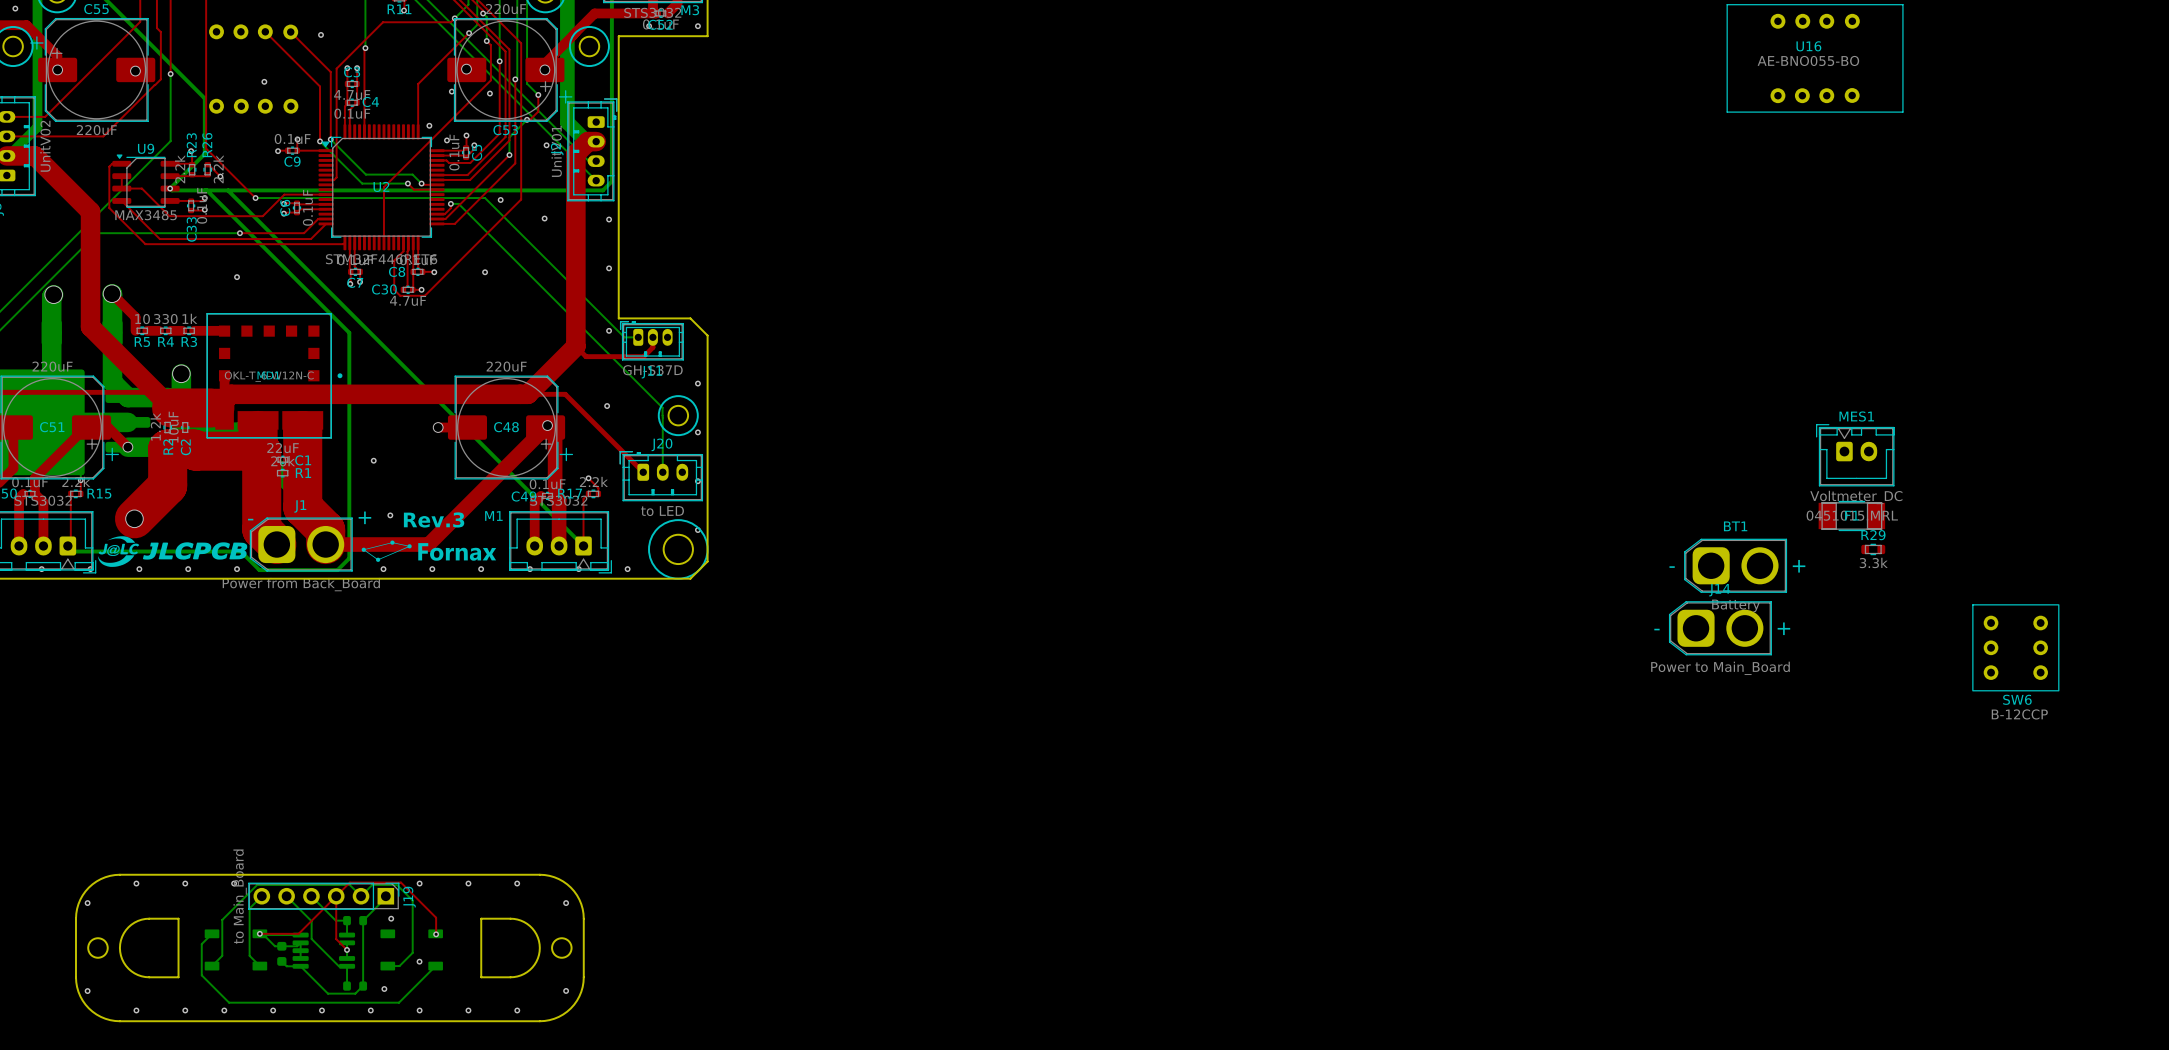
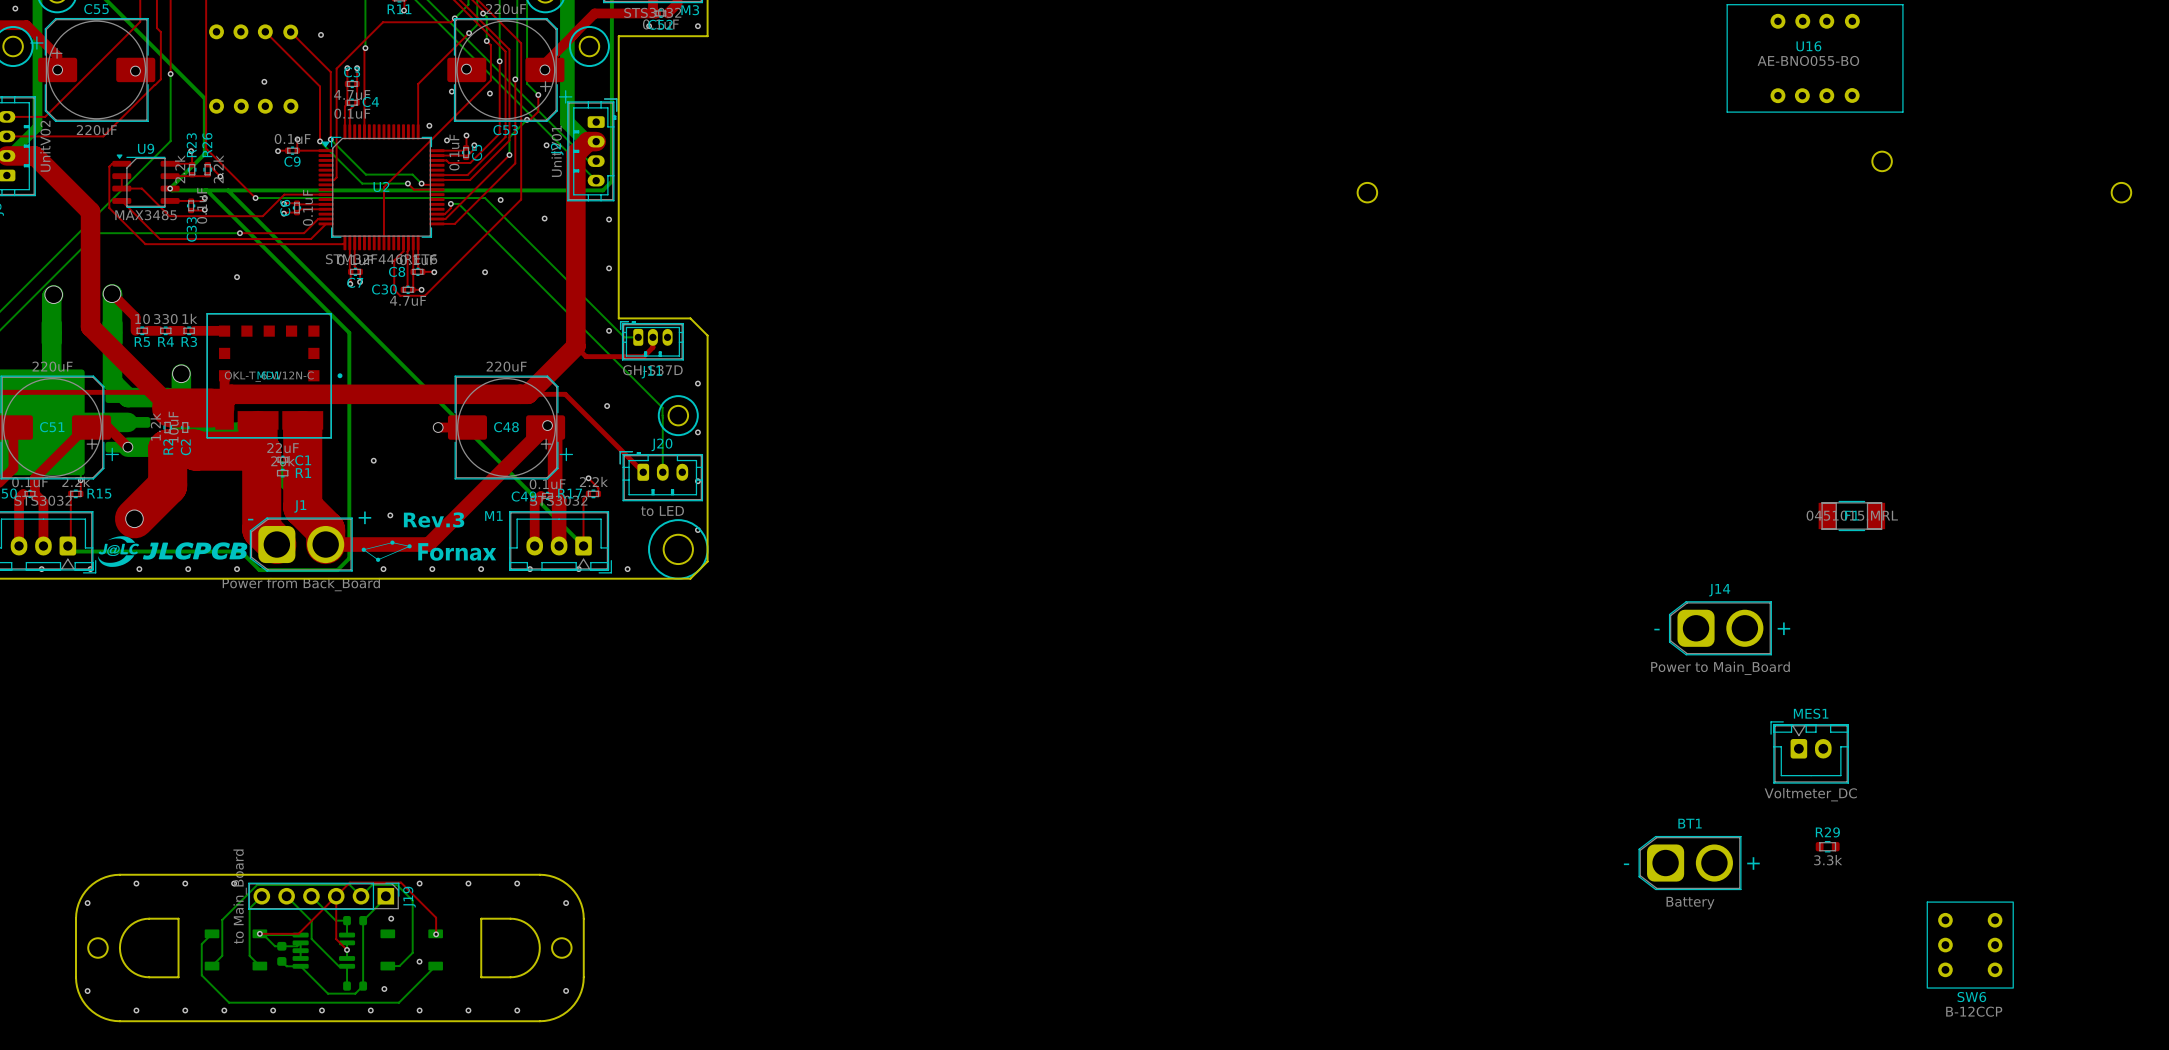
round board edge: none -> [1871, 150, 1893, 173]
round board edge: none -> [1356, 181, 1379, 204]
round board edge: none -> [2110, 181, 2133, 204]
MES1 position: (1855, 455) -> (1809, 752)
R29 position: (1873, 549) -> (1827, 846)
BT1 position: (1735, 565) -> (1690, 863)
SW6 position: (2015, 647) -> (1970, 945)

